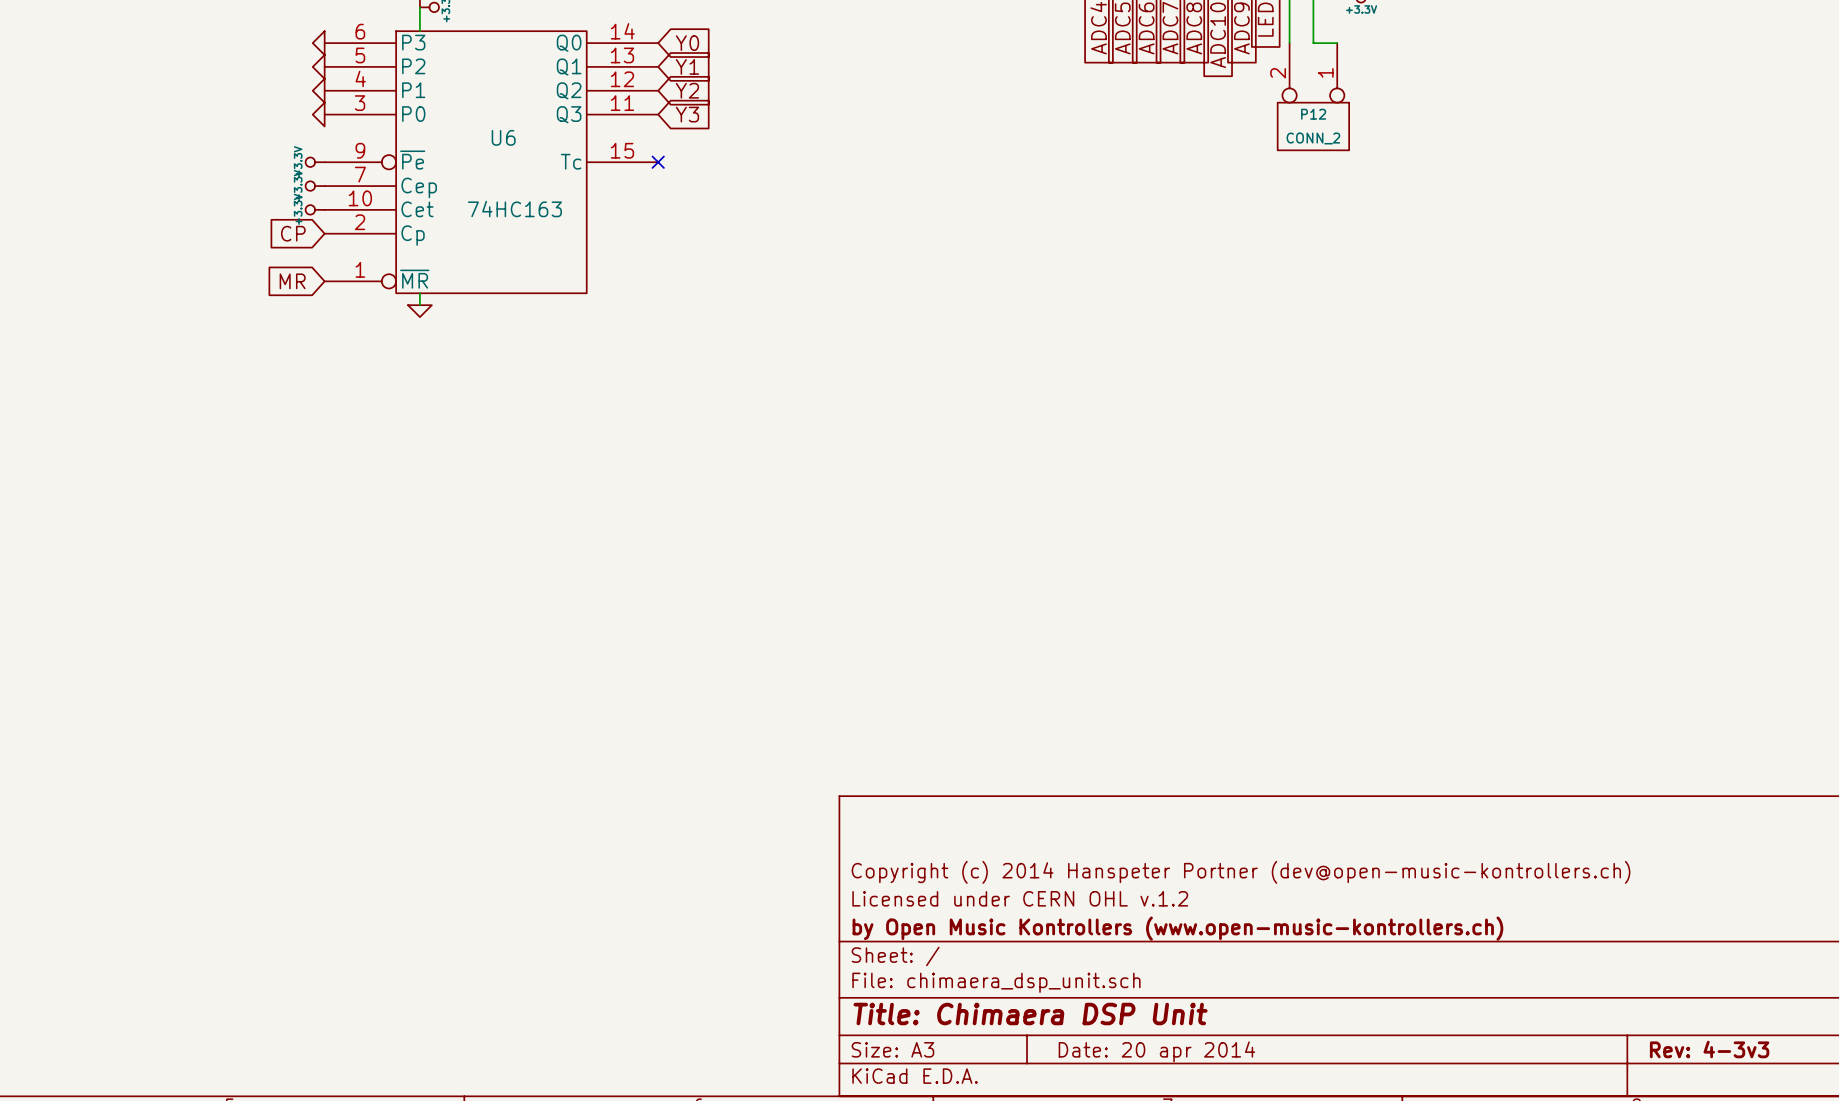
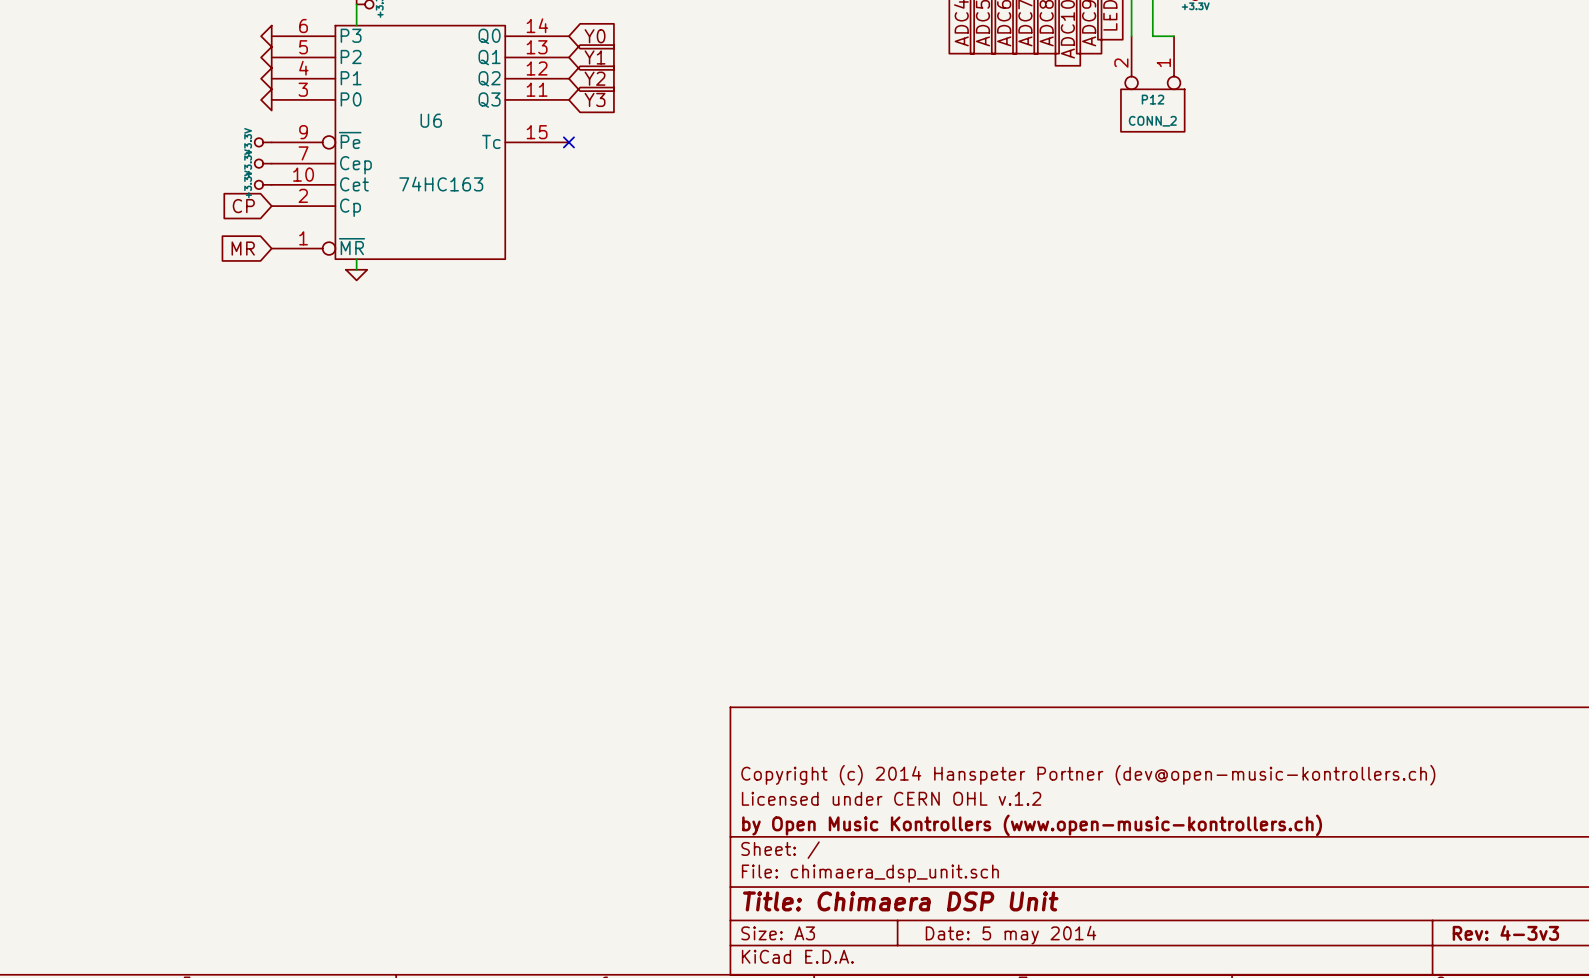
title block: Date: 20 apr 2014 (1156, 1051) -> Date: 5 may 2014 (1010, 935)

